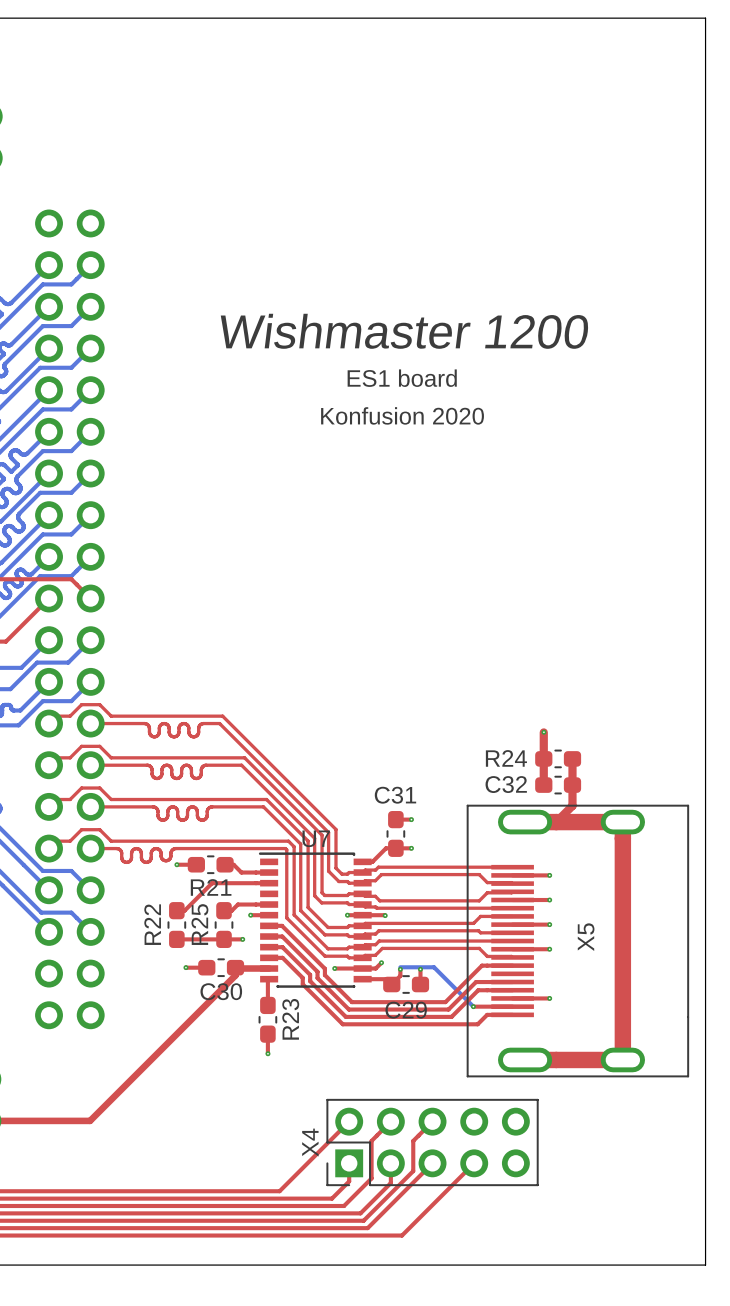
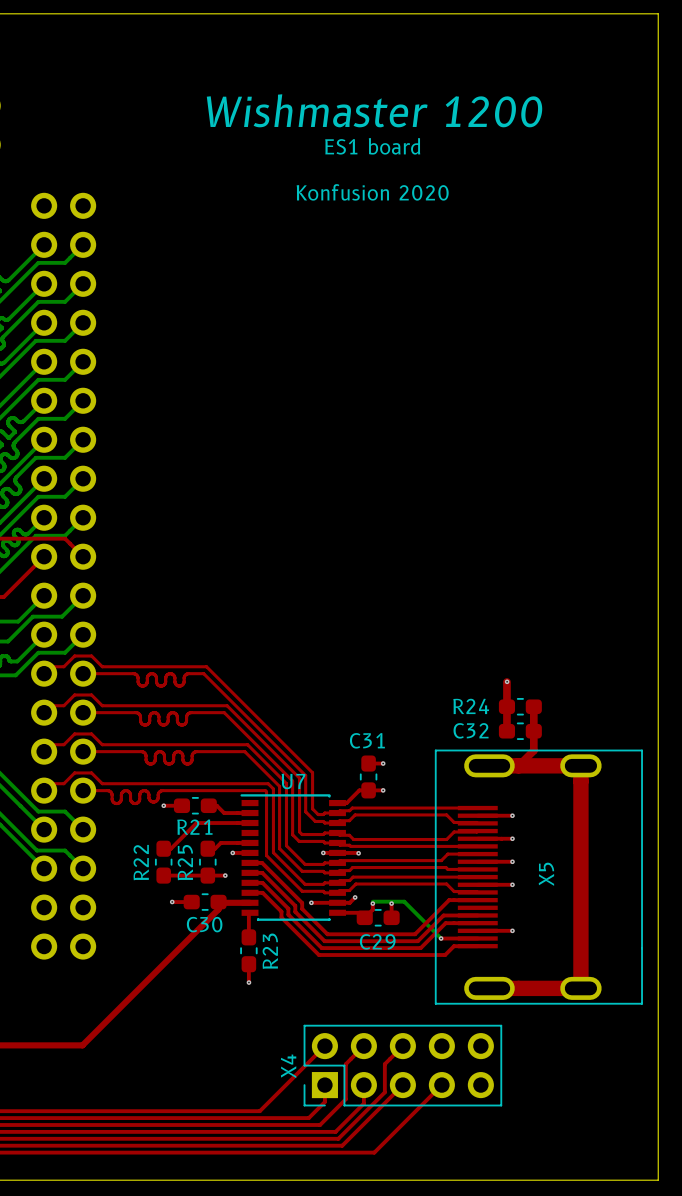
text position: Wishmaster 1200 (404, 331) -> Wishmaster 1200 (374, 110)
text position: ES1 board (402, 378) -> ES1 board (372, 146)
text position: Konfusion 2020 (402, 415) -> Konfusion 2020 (372, 192)

